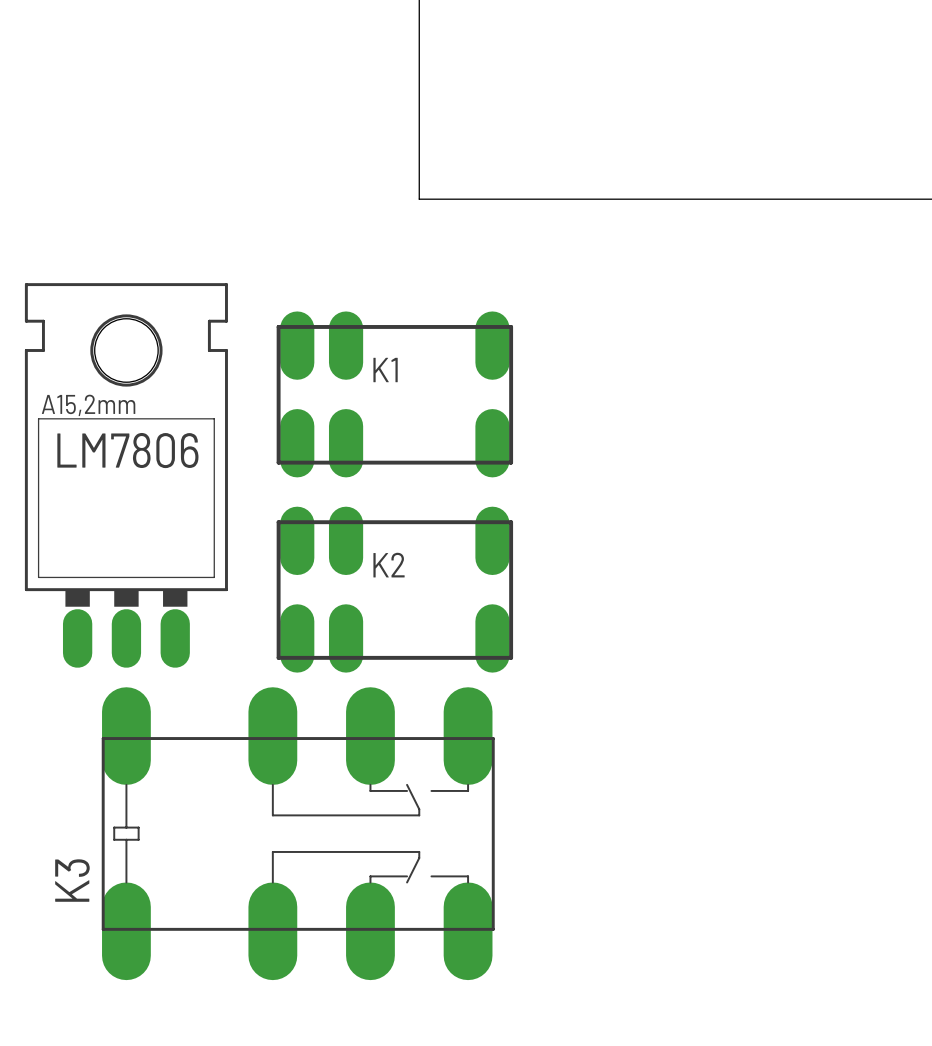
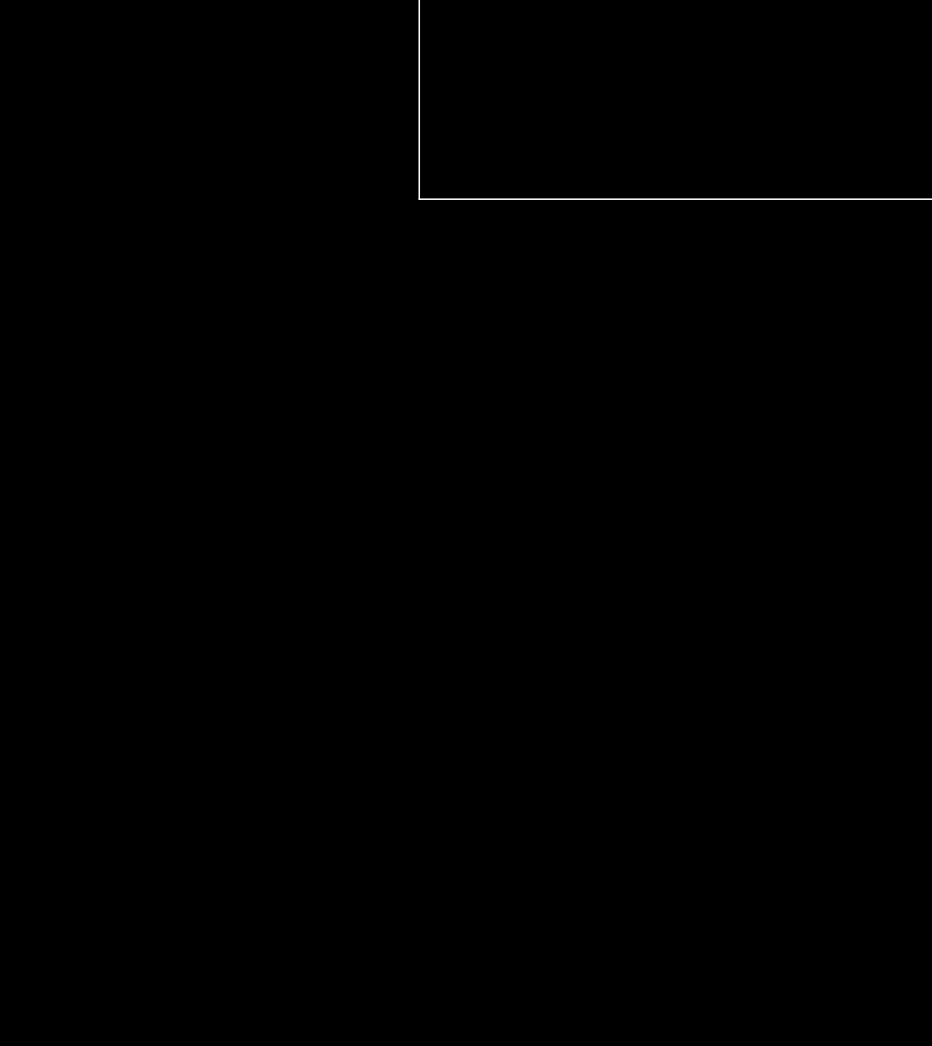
K1: (394, 394) -> none
LM7806: (126, 475) -> none
K2: (394, 589) -> none
K3: (298, 833) -> none

